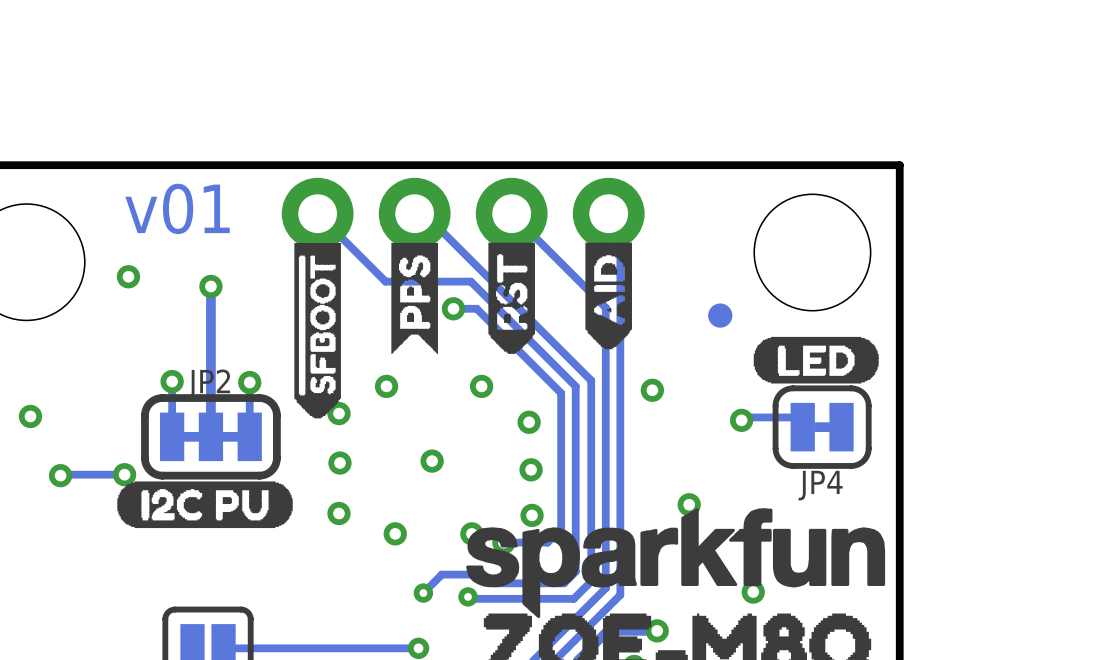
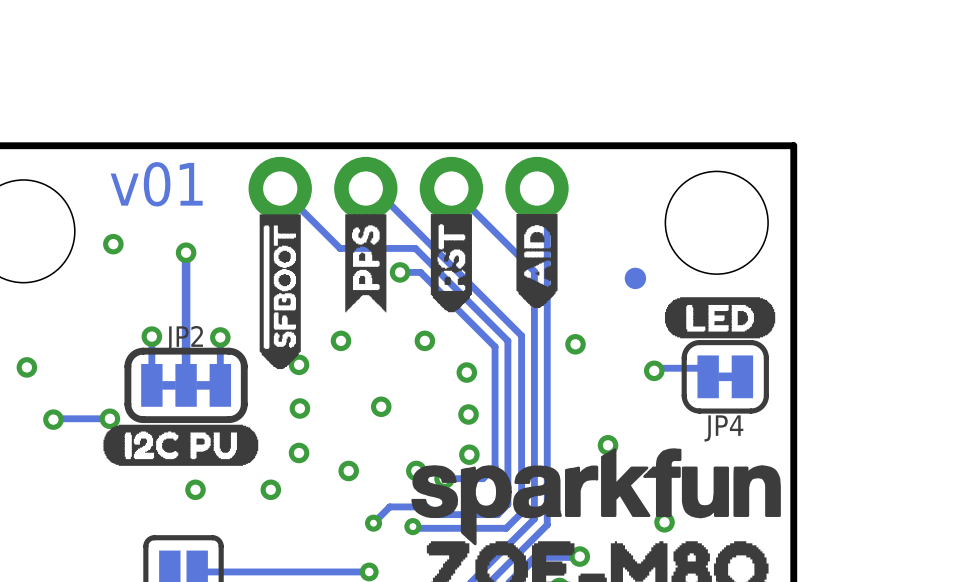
via: none -> (195, 489)
via: none -> (270, 489)

